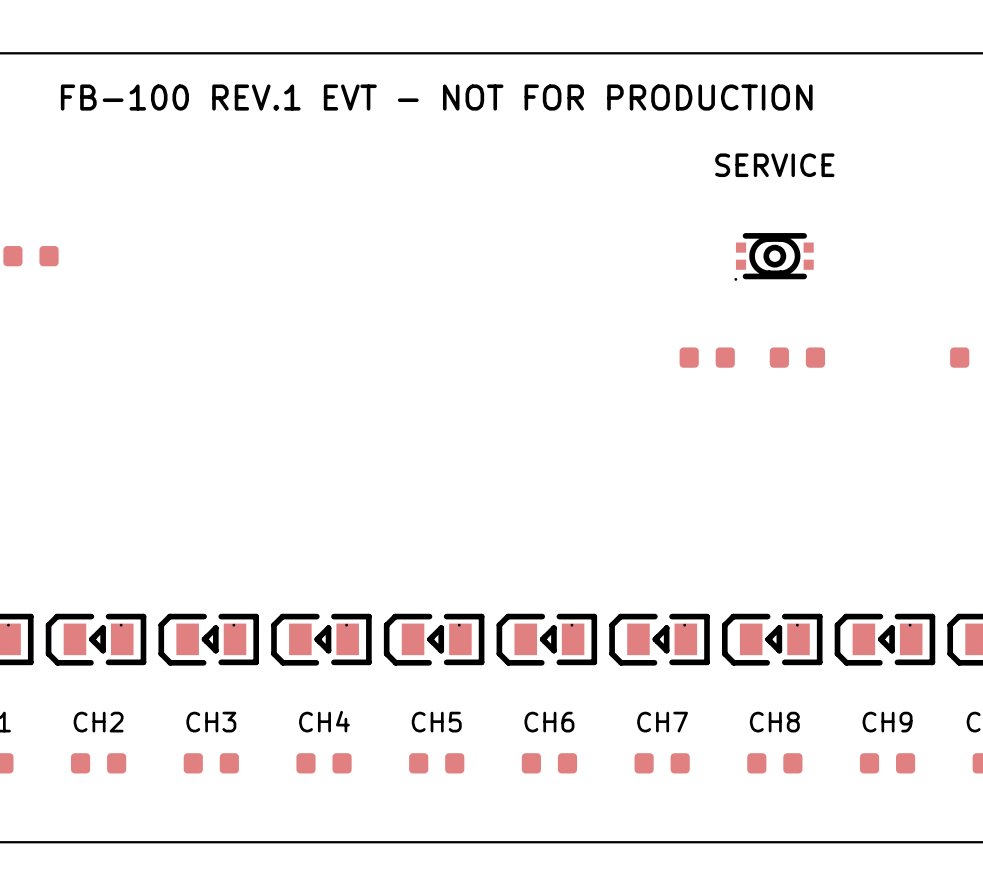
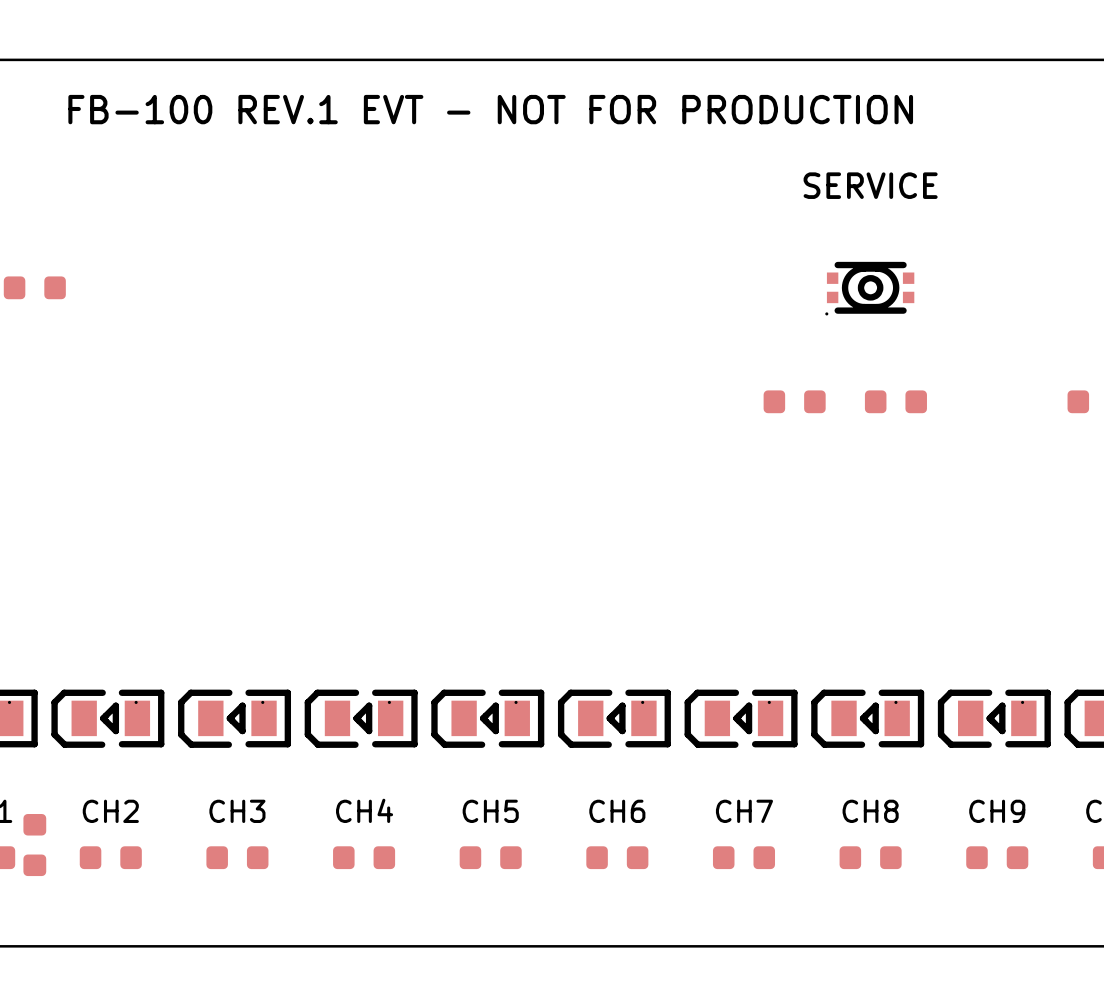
part: none -> (34, 845)

